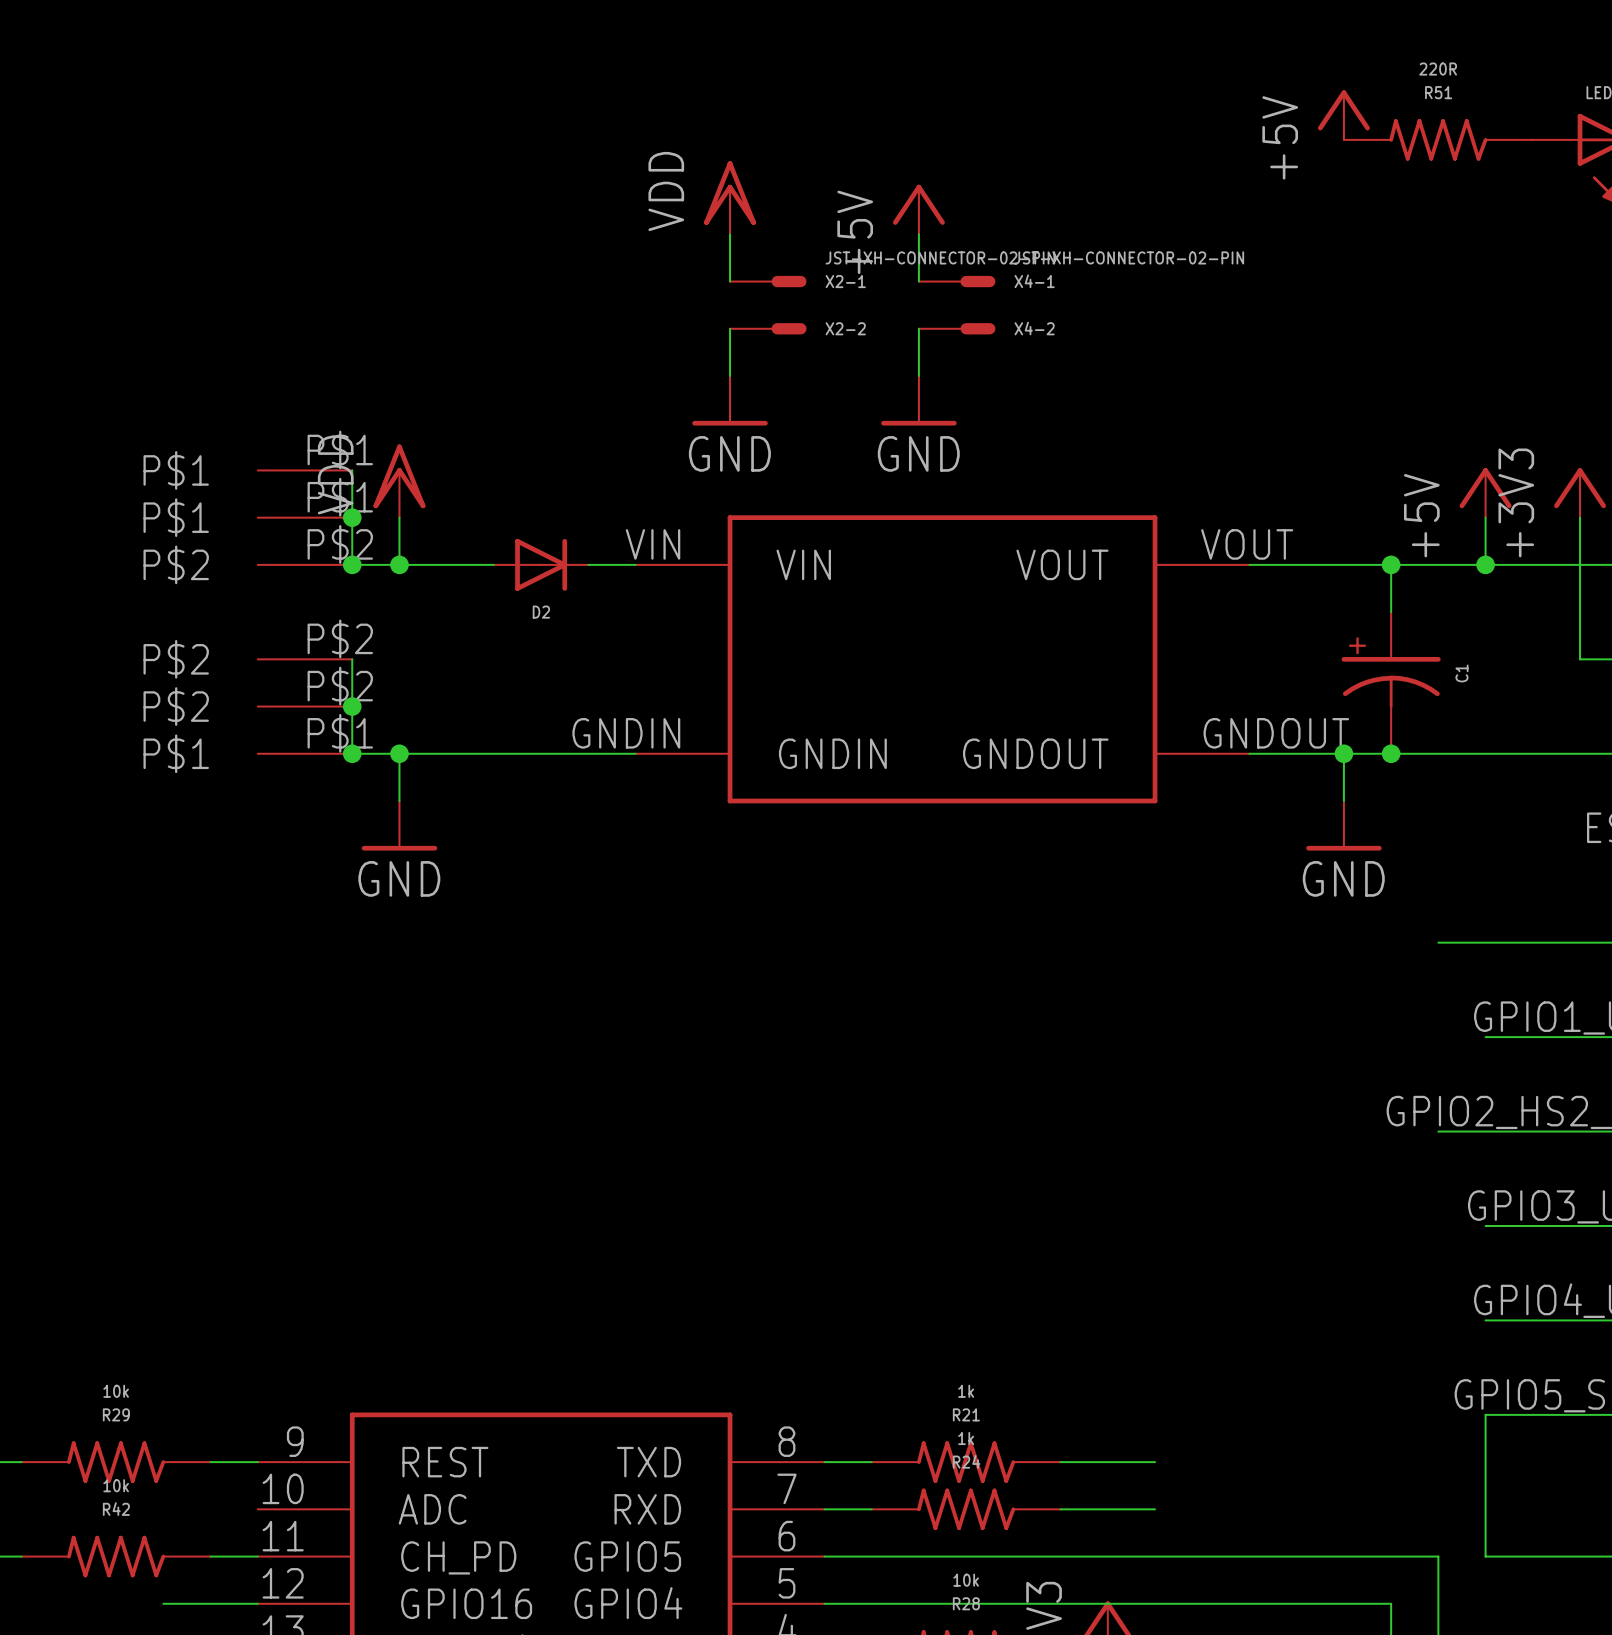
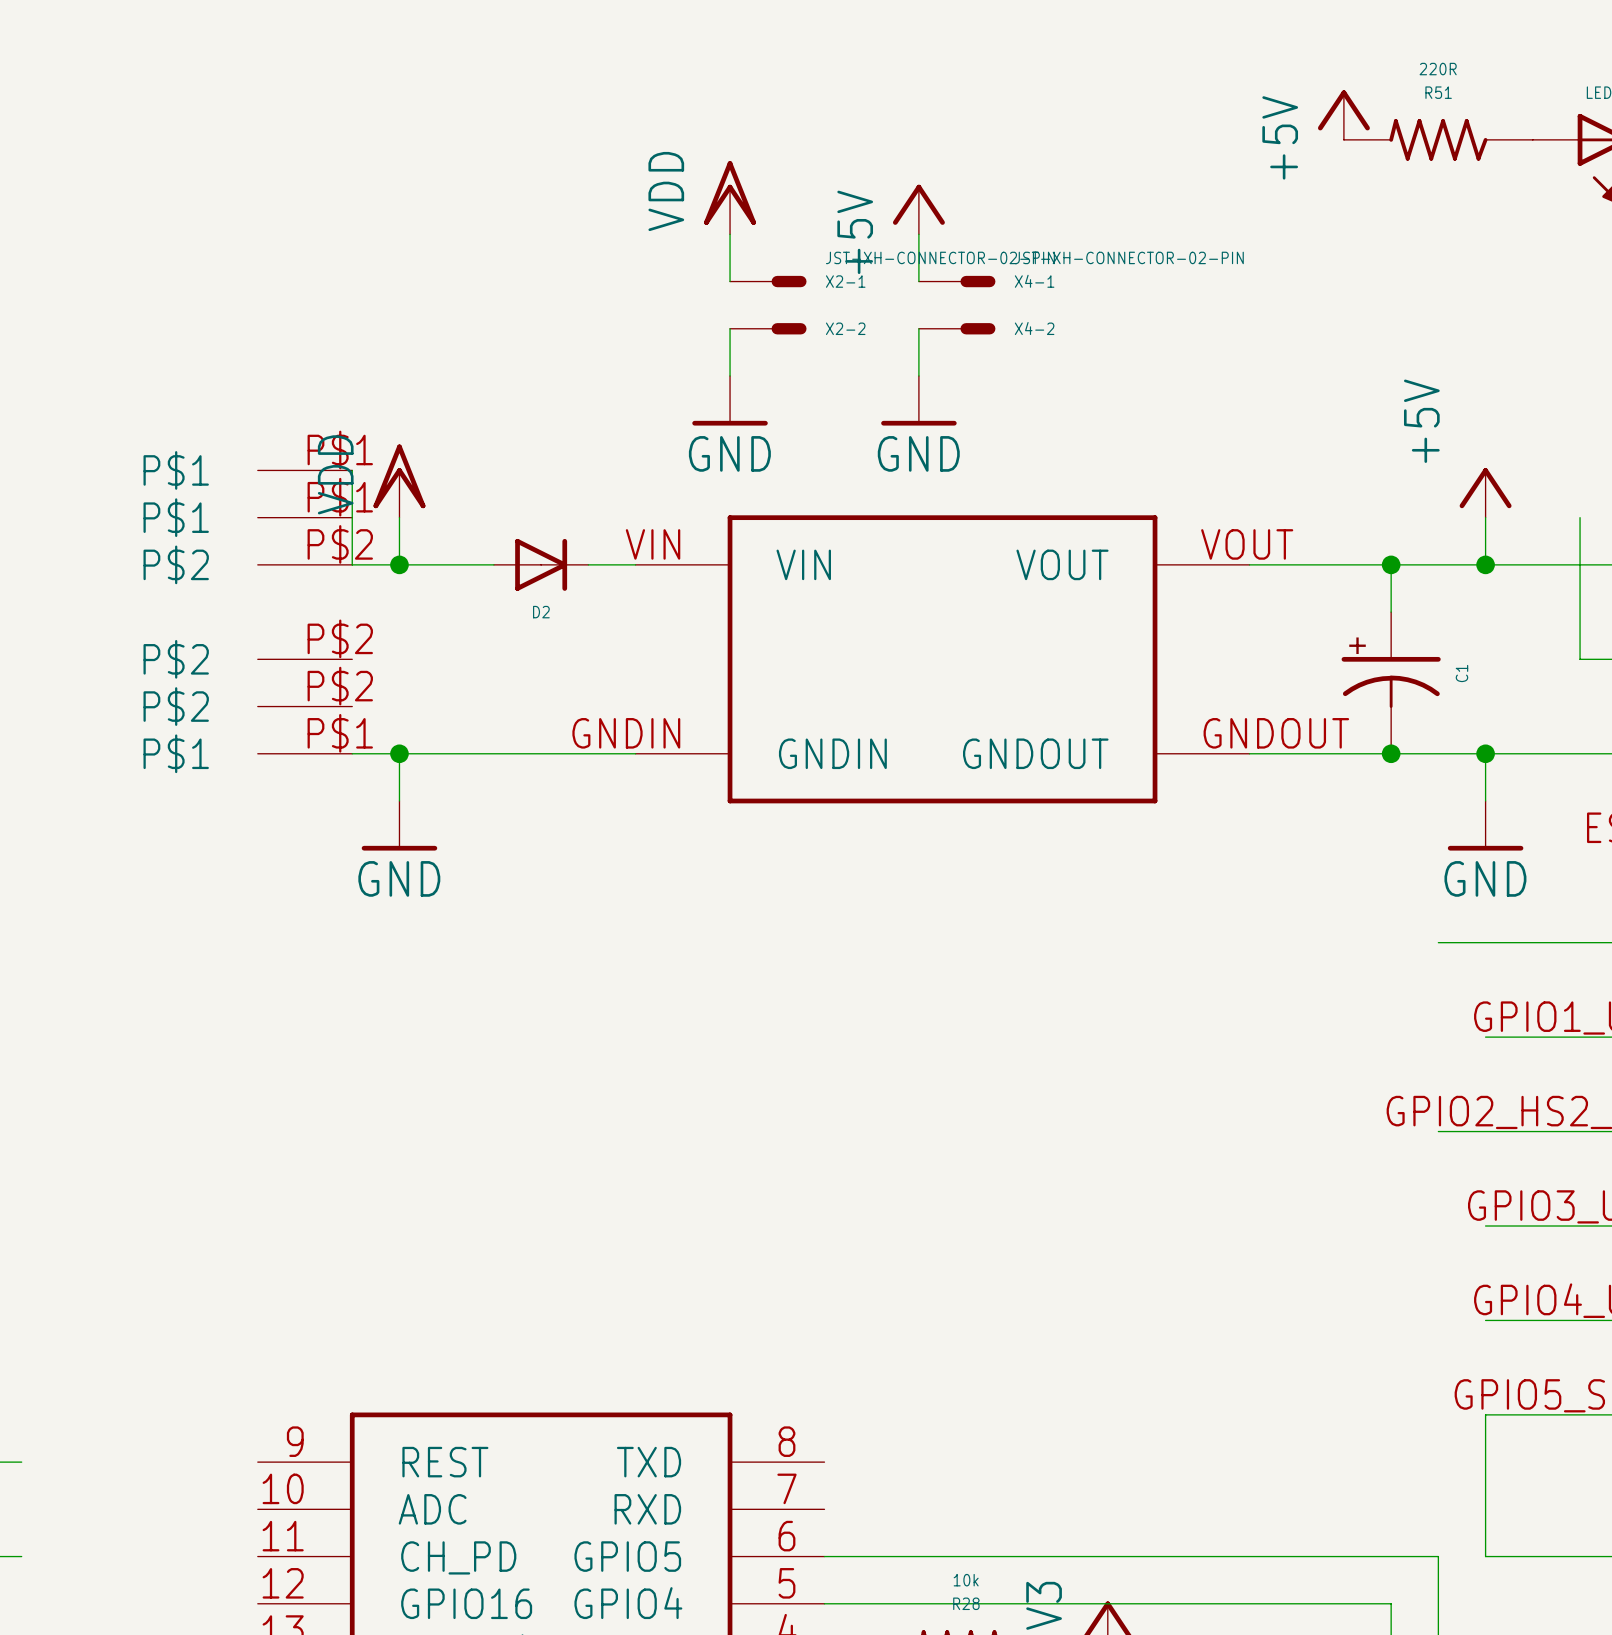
power symbol: +3V3 (1580, 492) -> none
power symbol text position: +5V (1421, 515) -> +5V (1421, 421)
junction: (352, 517) -> none
junction: (352, 564) -> none
wire: (352, 659) (352, 753) -> none
junction: (352, 706) -> none
junction: (352, 753) -> none
wire: (1343, 753) (1343, 800) -> (1485, 753) (1485, 800)
junction: (1343, 753) -> none
junction: none -> (1485, 753)
power symbol position: GND (1343, 825) -> GND (1485, 825)
R29: 10k (116, 1462) -> none
wire: (210, 1462) (257, 1462) -> none
wire: (824, 1462) (871, 1462) -> none
R21: 1k (966, 1462) -> none
wire: (1060, 1462) (1155, 1462) -> none
wire: (824, 1509) (871, 1509) -> none
R24: 1k (966, 1509) -> none
wire: (1060, 1509) (1155, 1509) -> none
R42: 10k (116, 1556) -> none
wire: (210, 1556) (257, 1556) -> none
wire: (163, 1603) (257, 1603) -> none

